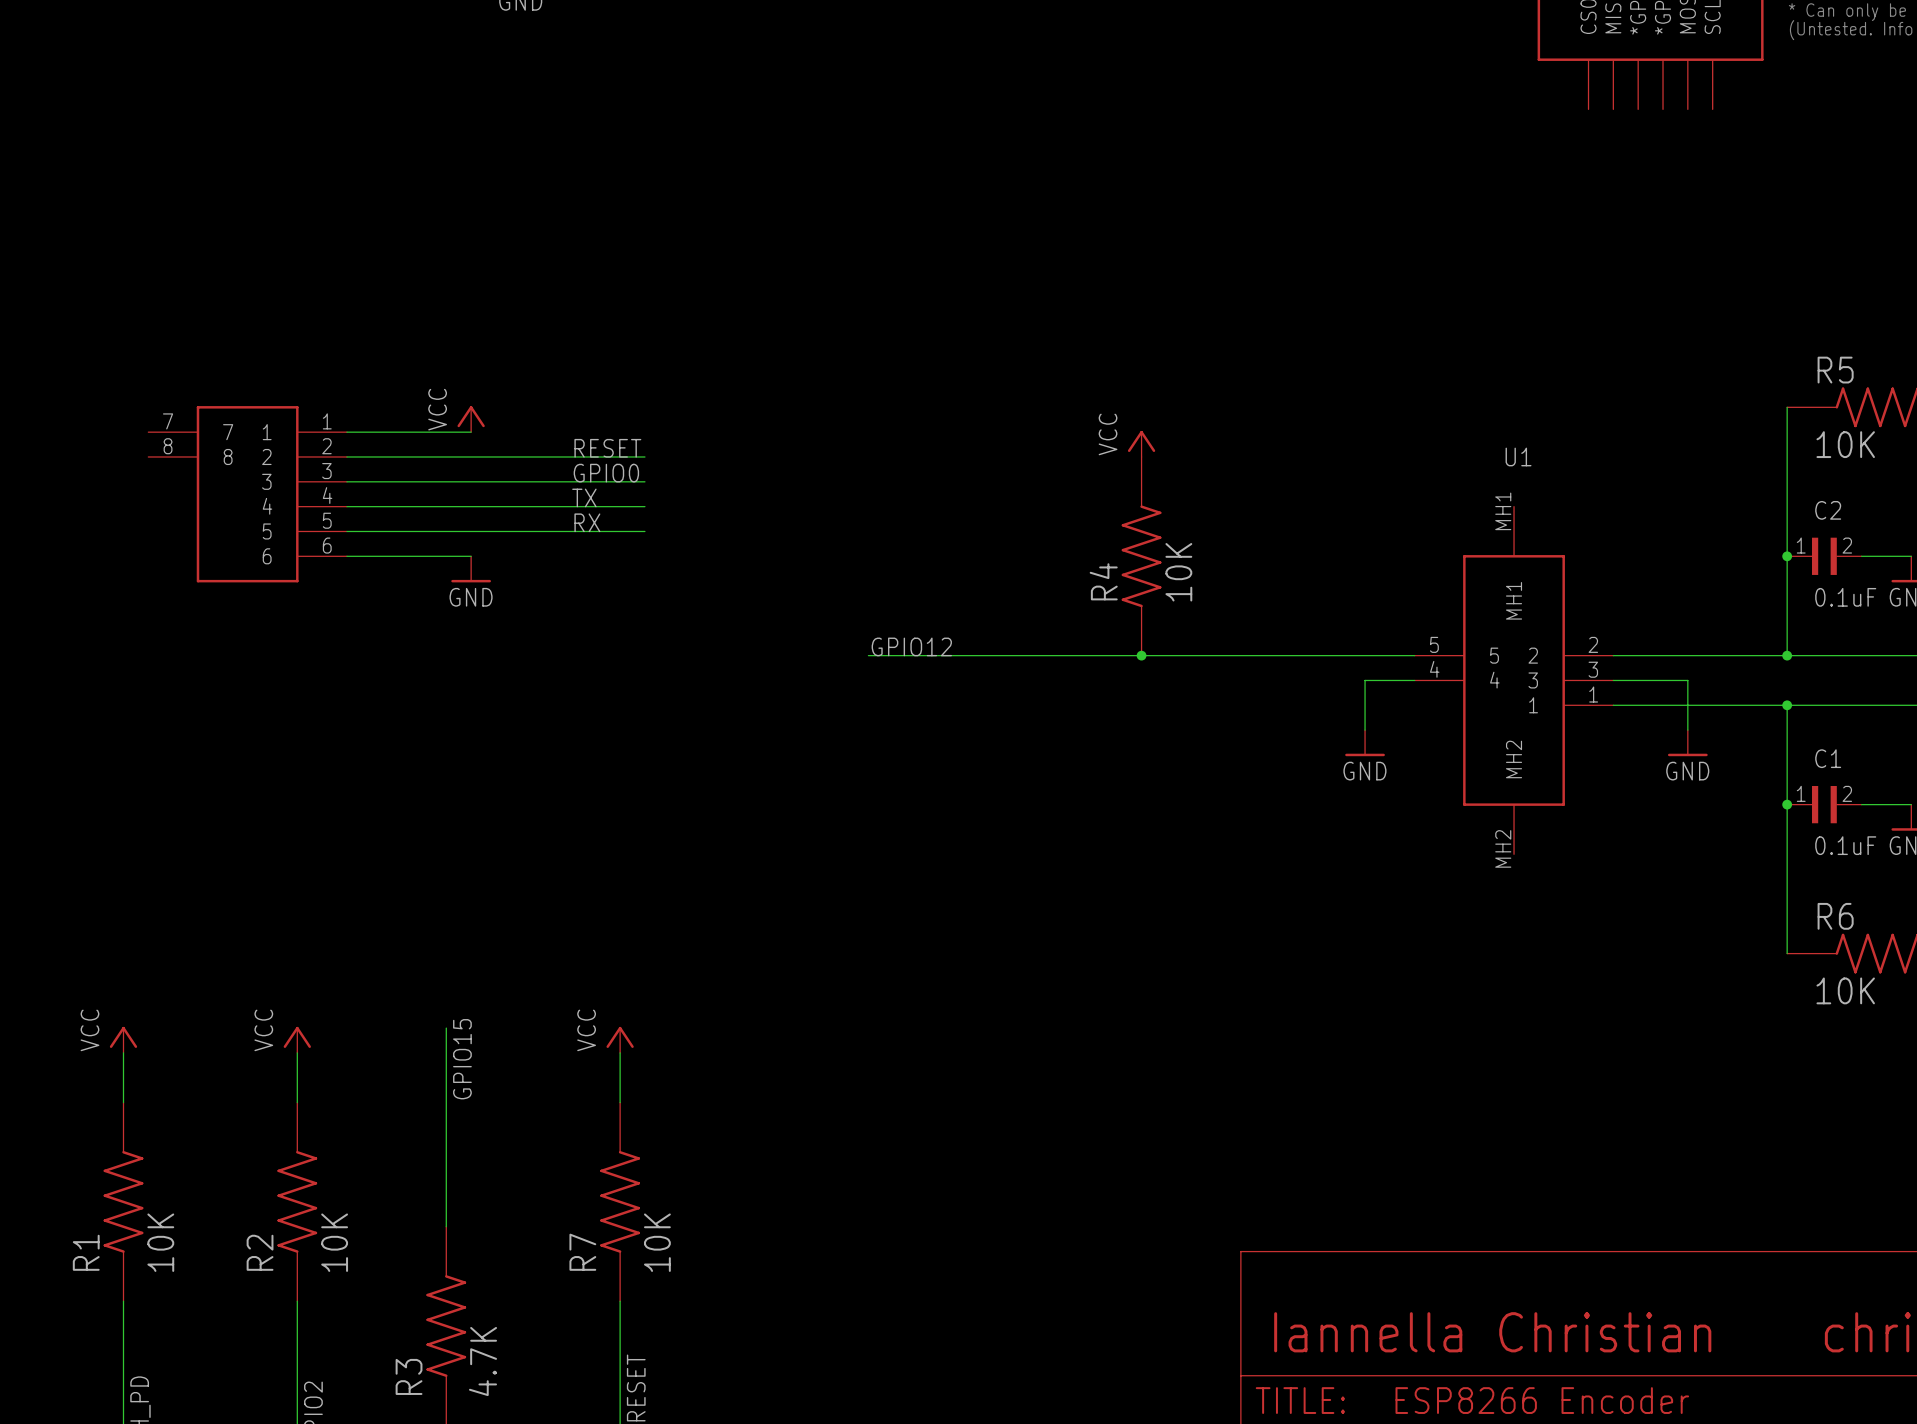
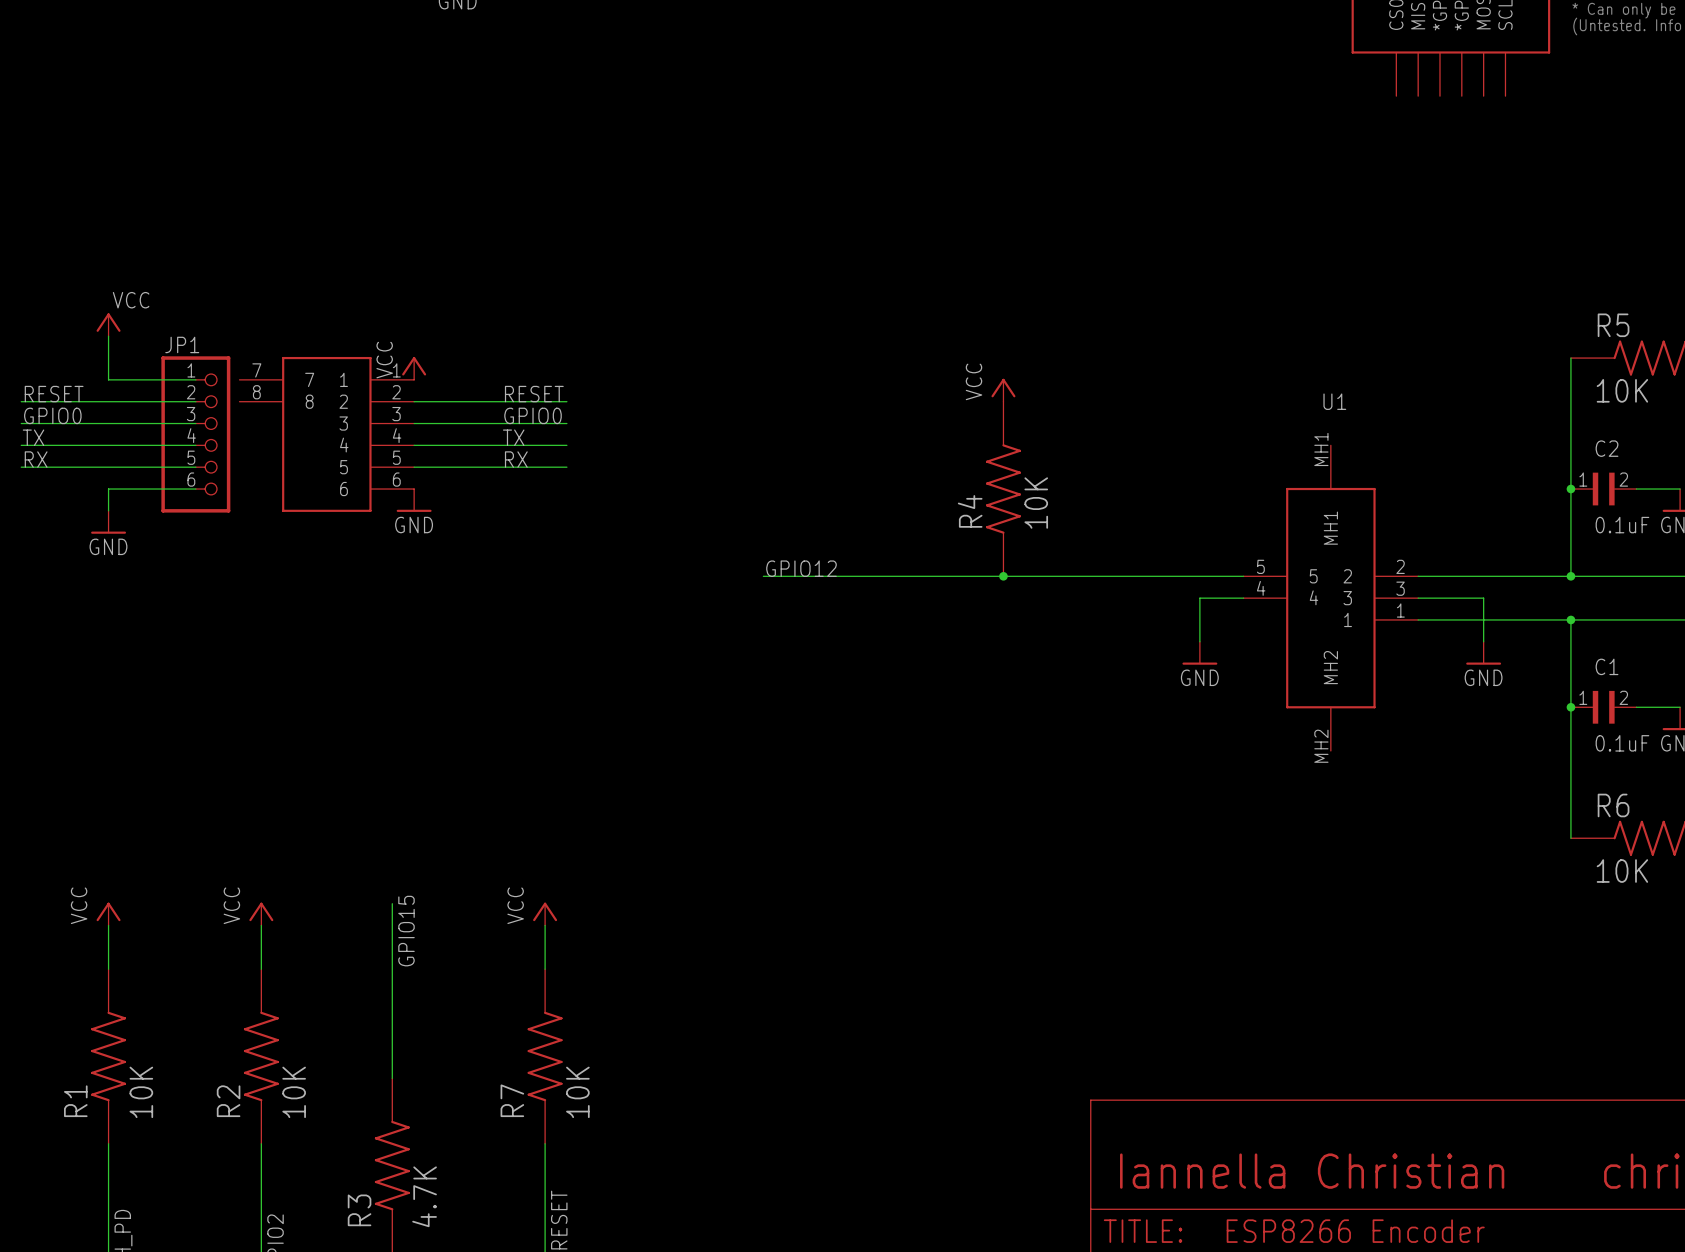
power symbol: none -> VCC (108, 324)
wire: none -> (108, 336) (108, 379) (195, 379)
wire: (346, 432) (471, 432) -> none
label: none -> RESET (54, 394)
wire: none -> (21, 401) (195, 401)
wire: (346, 456) (471, 456) -> none
label: none -> GPIO0 (52, 415)
wire: none -> (21, 423) (195, 423)
wire: (346, 481) (471, 481) -> none
JP1: none -> (195, 434)
part position: (247, 494) -> (326, 434)
label: none -> TX (33, 437)
wire: none -> (21, 445) (195, 445)
wire: (346, 506) (471, 506) -> none
label: none -> RX (36, 459)
wire: none -> (21, 467) (195, 467)
wire: (346, 531) (471, 531) -> none
wire: none -> (195, 489) (108, 489) (108, 510)
wire: (346, 556) (471, 556) -> none
power symbol: none -> GND (108, 522)

